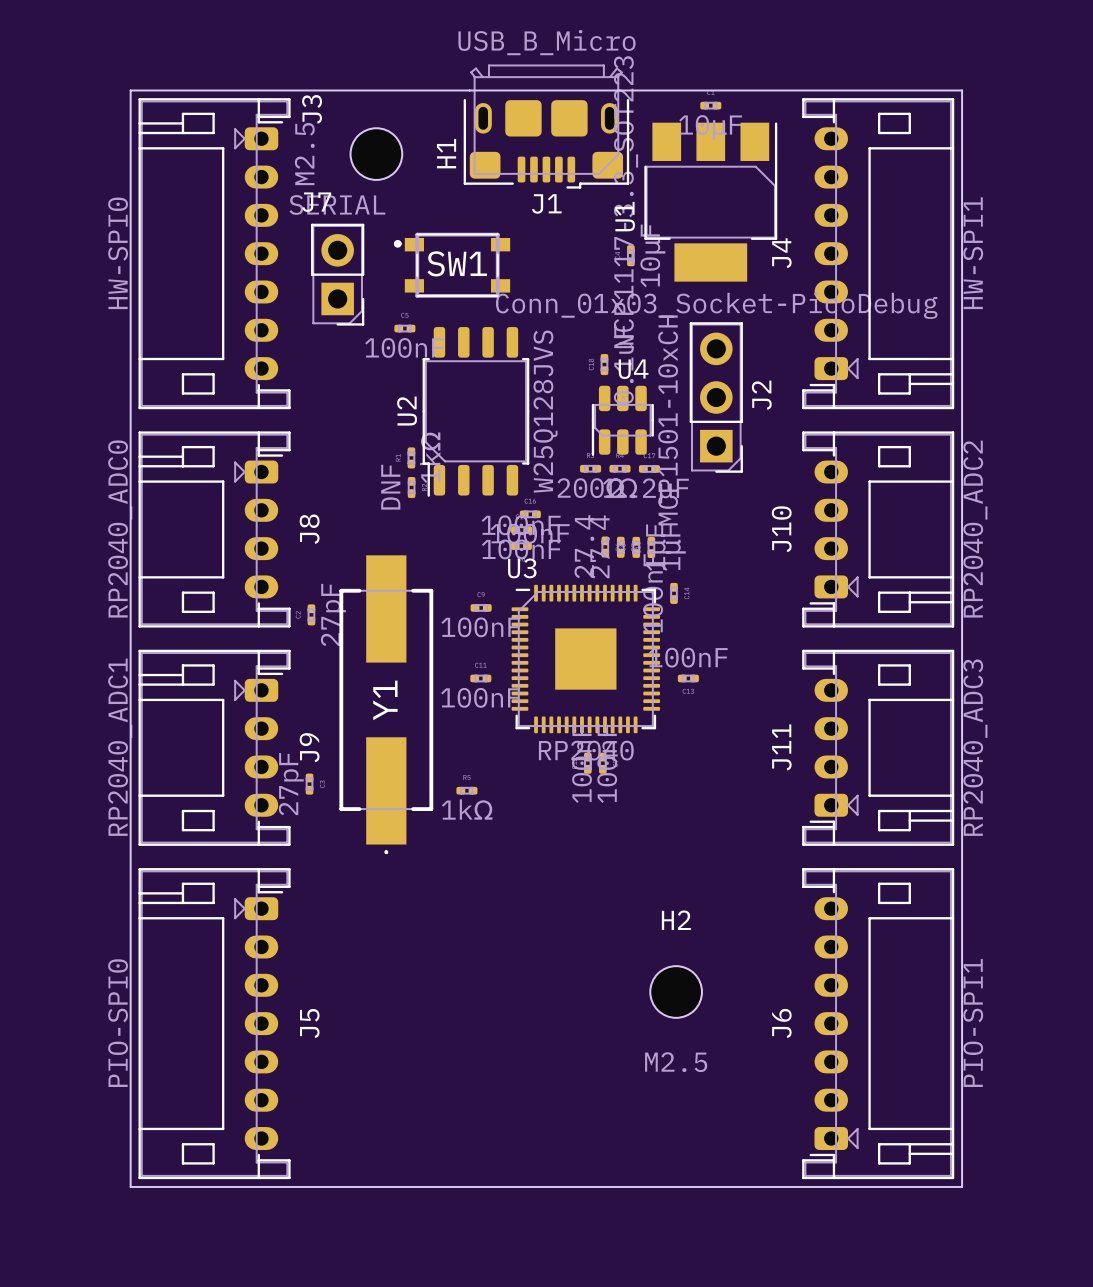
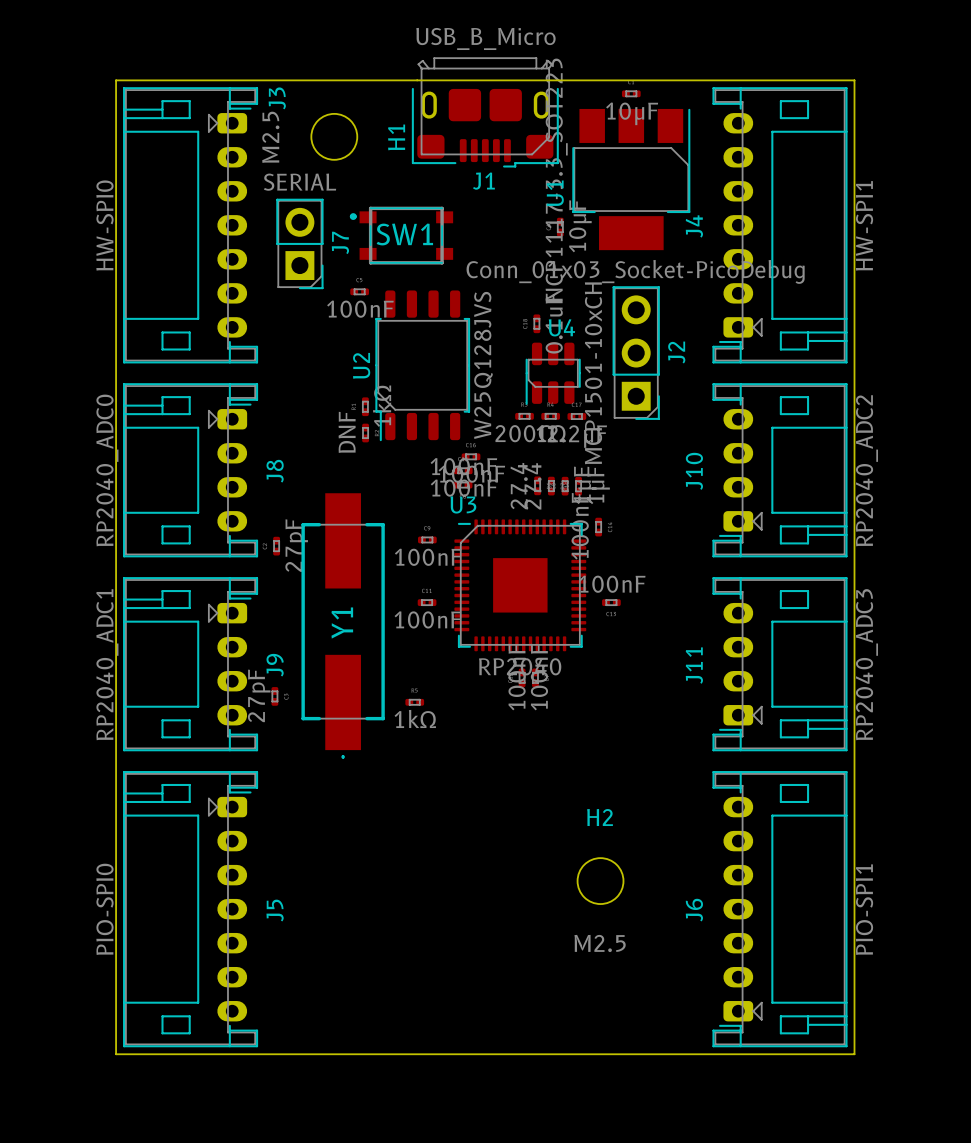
J7 name rotation: 0° (316, 202) -> 90° counterclockwise (340, 242)
J7 name position: J7 (316, 202) -> J7 (340, 242)

